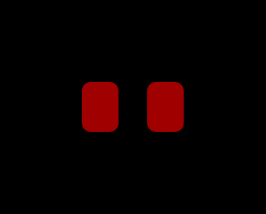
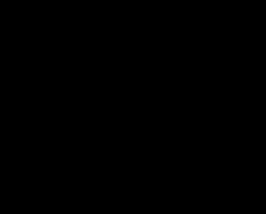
part: (132, 106) -> none

